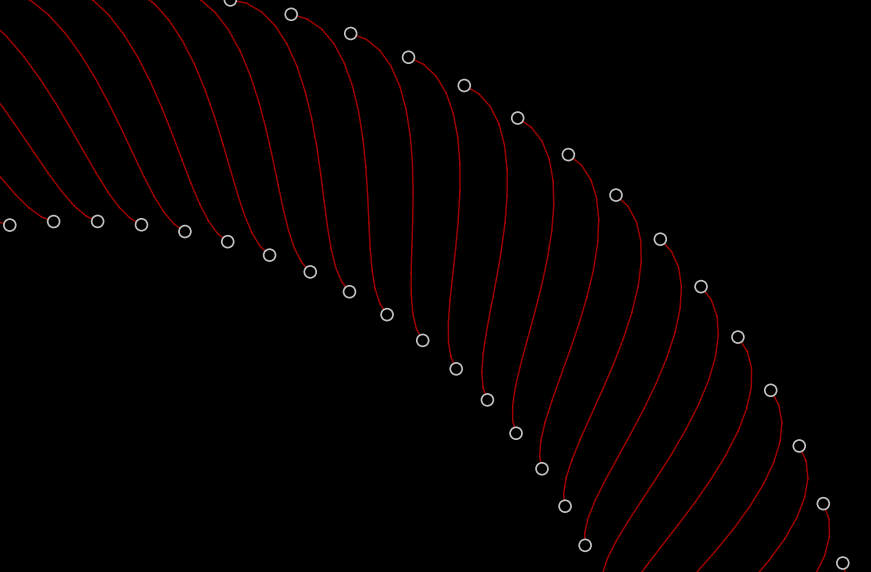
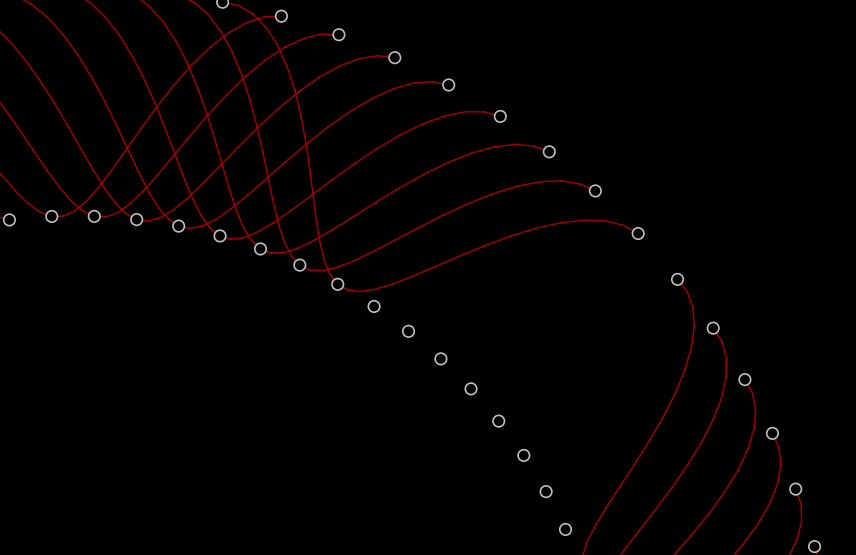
track: (291, 14) (307, 18) (321, 28) (333, 43) (344, 62) (352, 85) (362, 139) (372, 270) (379, 303) (387, 314) -> (281, 16) (264, 16) (246, 22) (228, 32) (209, 47) (173, 85) (111, 170) (86, 201) (74, 211) (63, 216) (51, 216)
track: (350, 33) (366, 39) (379, 50) (390, 66) (399, 86) (406, 109) (412, 163) (411, 294) (416, 329) (422, 340) -> (338, 34) (322, 34) (303, 38) (284, 47) (265, 60) (226, 95) (157, 175) (129, 204) (117, 212) (105, 216) (94, 216)
track: (408, 57) (423, 64) (436, 76) (446, 92) (453, 113) (457, 137) (459, 191) (448, 322) (450, 357) (456, 368) -> (394, 57) (378, 55) (359, 58) (339, 65) (319, 77) (277, 109) (202, 183) (172, 210) (159, 217) (147, 221) (136, 219)
track: (464, 85) (478, 93) (490, 106) (498, 124) (504, 145) (507, 169) (504, 223) (483, 353) (483, 387) (487, 399) -> (448, 84) (432, 81) (413, 83) (393, 88) (371, 98) (327, 127) (247, 195) (215, 219) (202, 226) (189, 228) (178, 226)
track: (517, 118) (531, 127) (542, 141) (549, 159) (553, 180) (553, 204) (547, 258) (515, 386) (512, 420) (516, 433) -> (500, 116) (484, 111) (465, 111) (444, 115) (422, 123) (376, 148) (290, 210) (257, 232) (243, 237) (230, 239) (220, 235)
track: (568, 154) (581, 165) (590, 179) (596, 198) (598, 219) (597, 244) (586, 297) (545, 422) (539, 456) (541, 468) -> (549, 151) (533, 145) (514, 144) (493, 146) (471, 153) (423, 174) (333, 229) (297, 248) (283, 252) (271, 252) (260, 248)
track: (616, 195) (628, 206) (636, 221) (640, 240) (641, 262) (638, 286) (623, 338) (571, 459) (563, 493) (565, 506) -> (595, 190) (580, 183) (561, 180) (540, 181) (517, 186) (467, 203) (373, 251) (337, 267) (322, 270) (310, 269) (299, 265)
track: (660, 239) (671, 251) (678, 267) (681, 286) (680, 308) (675, 332) (656, 383) (595, 499) (584, 532) (585, 545) -> (638, 233) (623, 225) (605, 220) (584, 220) (560, 222) (510, 236) (412, 276) (374, 289) (359, 291) (347, 289) (337, 284)

